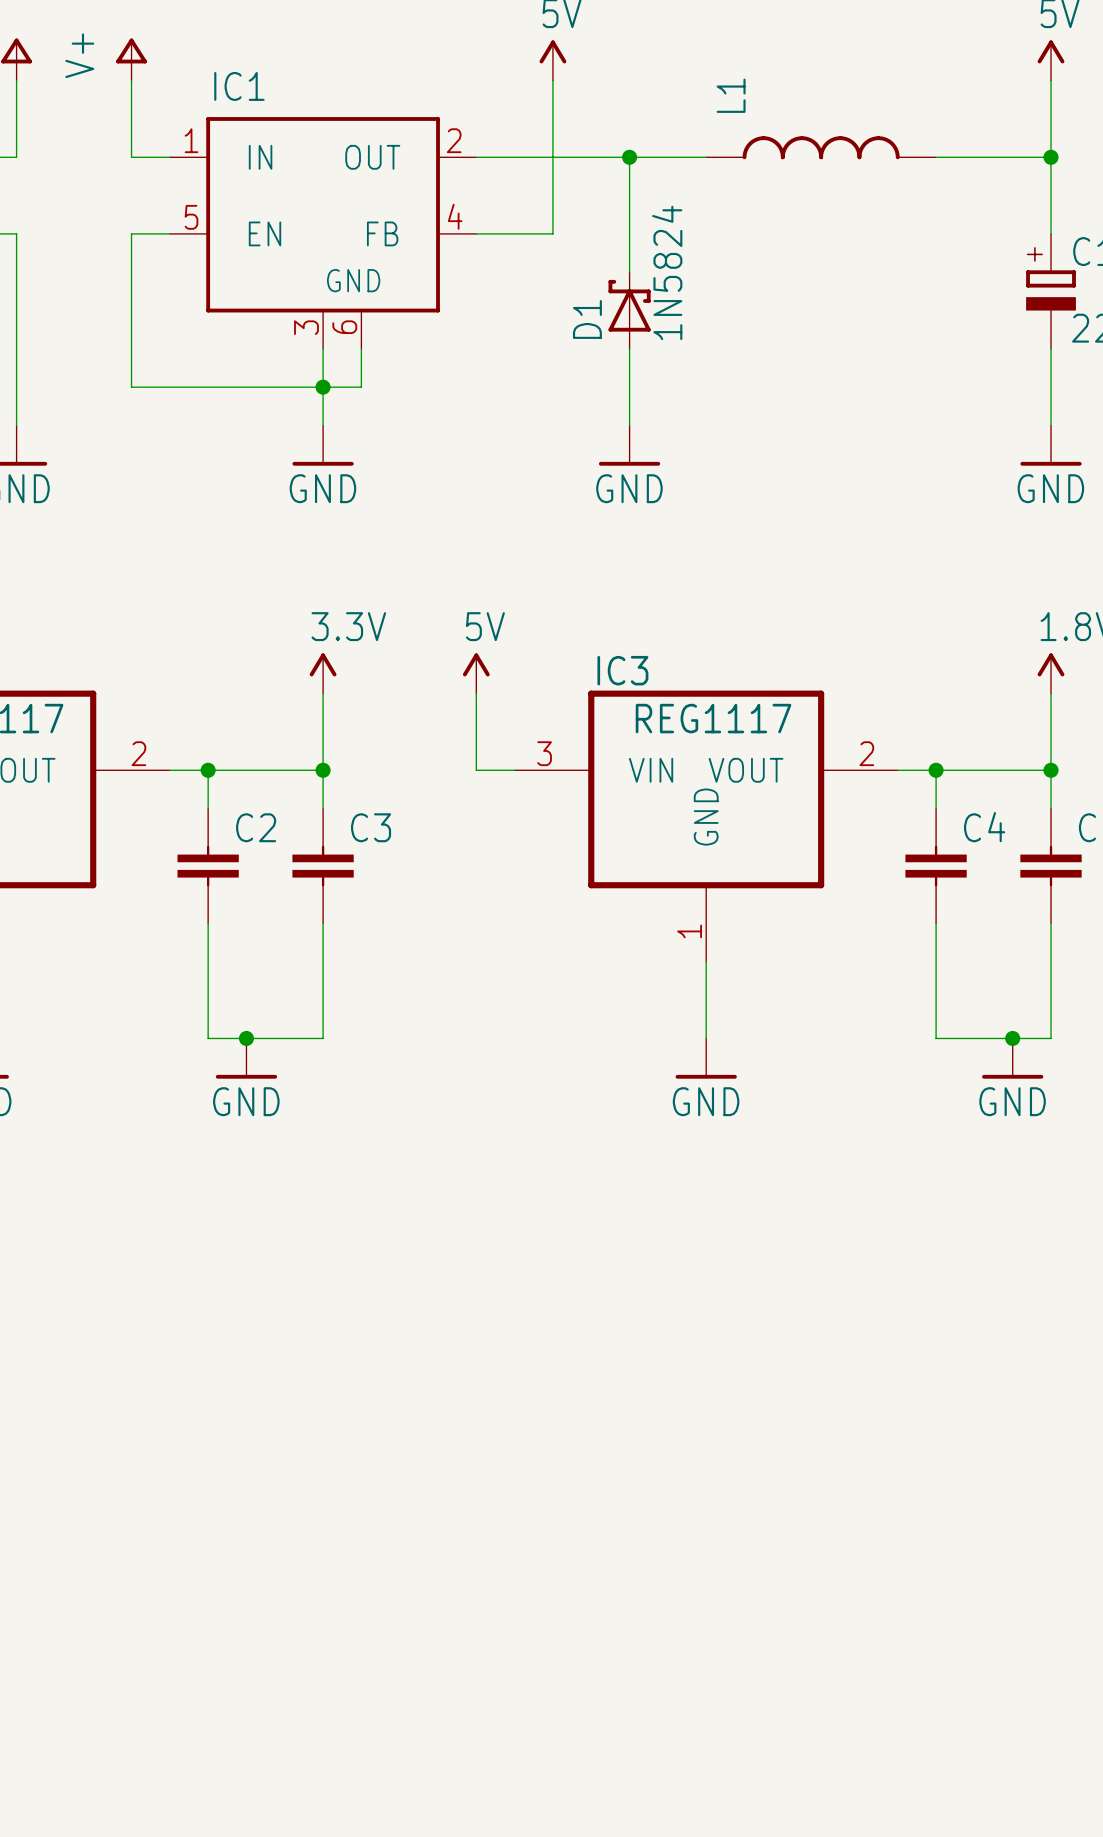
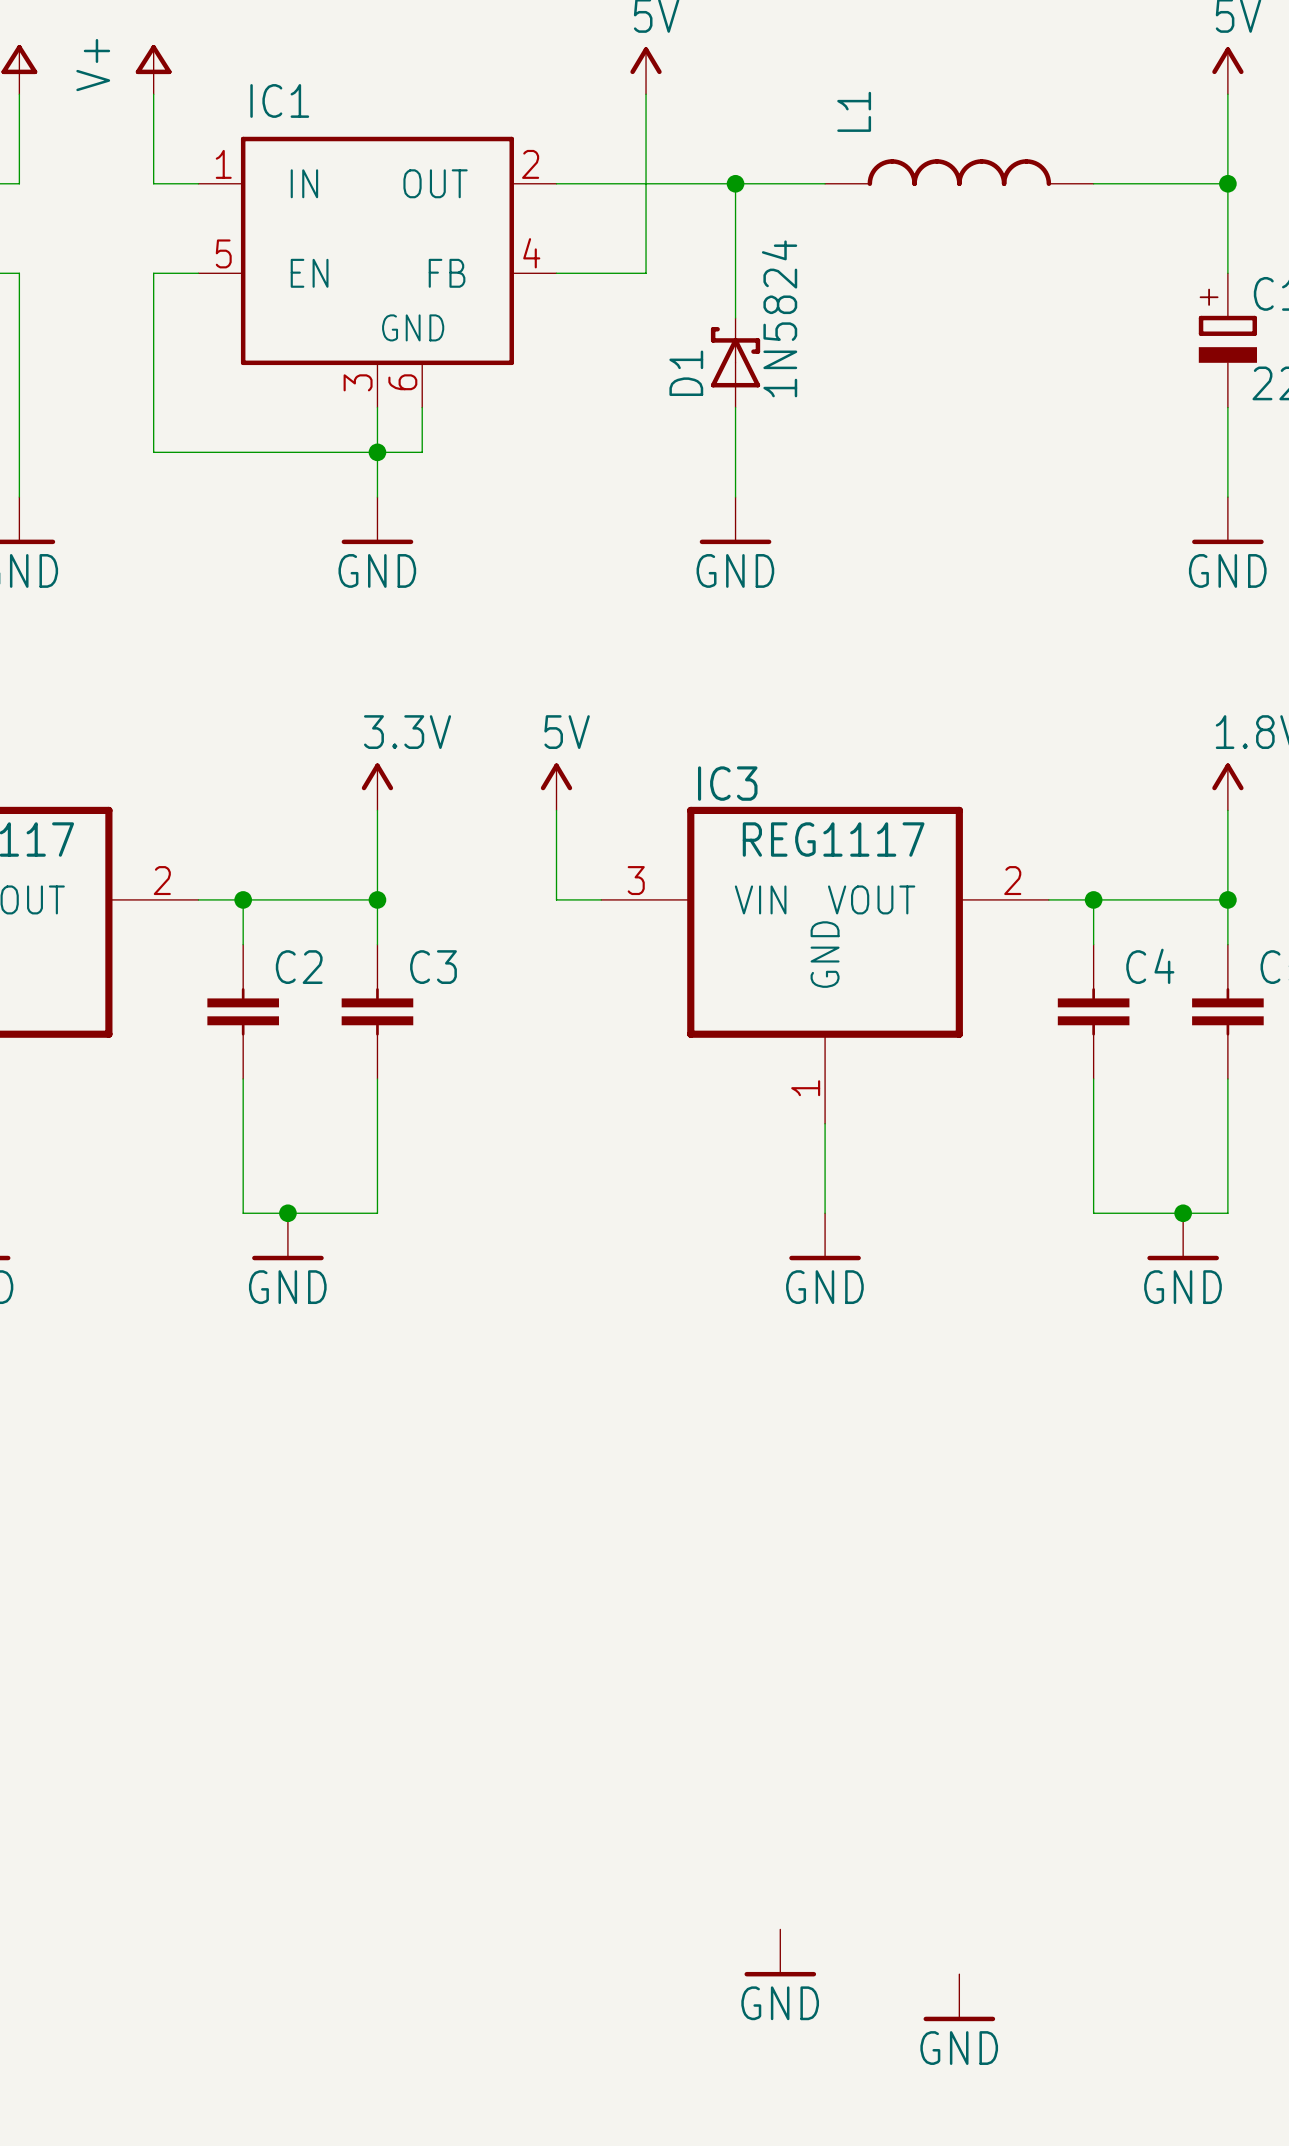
power symbol: none -> GND (780, 1952)
power symbol: none -> GND (959, 1997)

